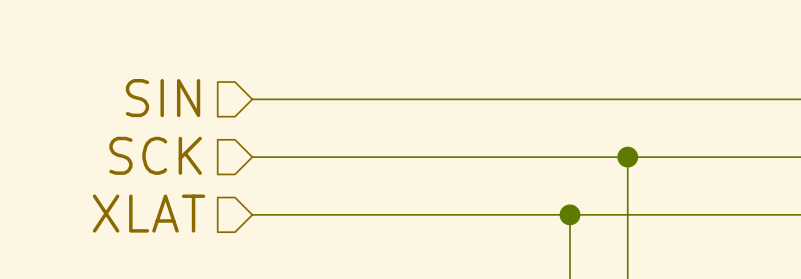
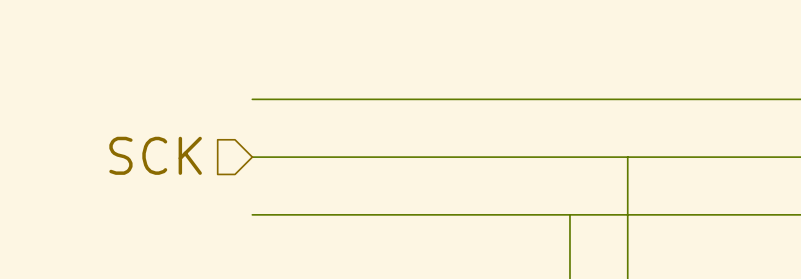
hierarchical label: SIN (163, 98) -> none
junction: (627, 157) -> none
hierarchical label: XLAT (148, 213) -> none
junction: (569, 214) -> none

